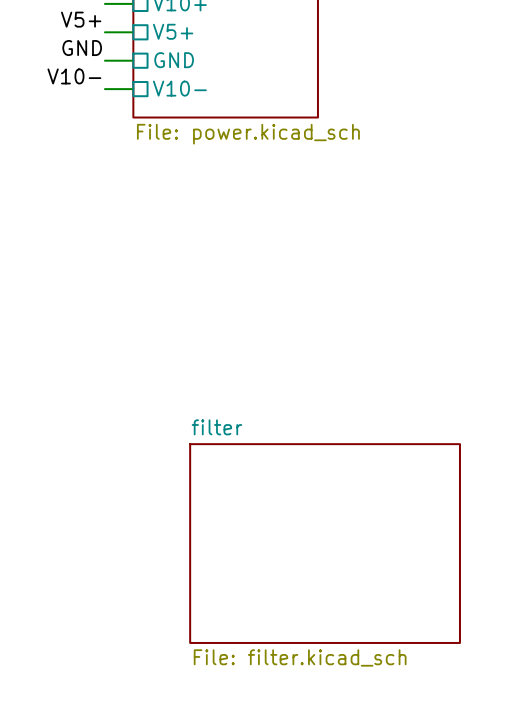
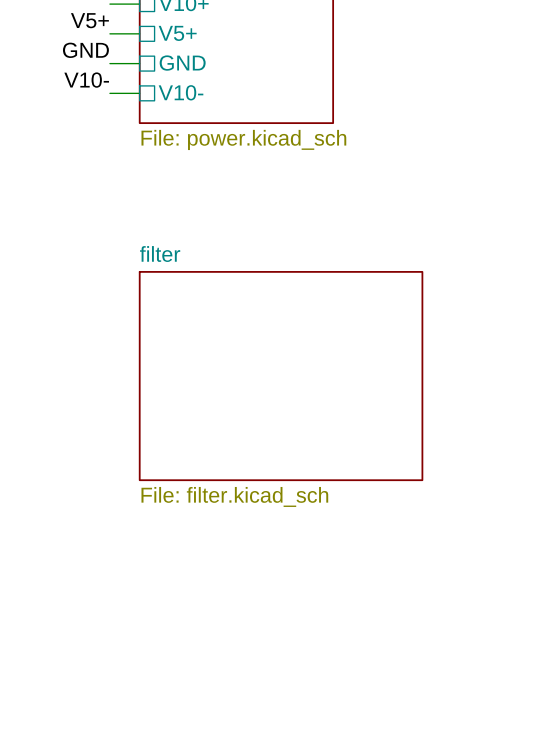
sheet filter position: (325, 543) -> (281, 376)

